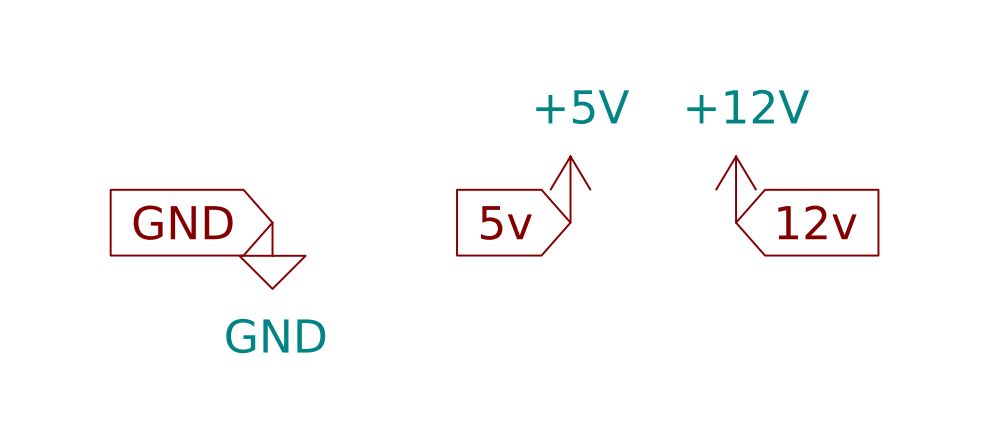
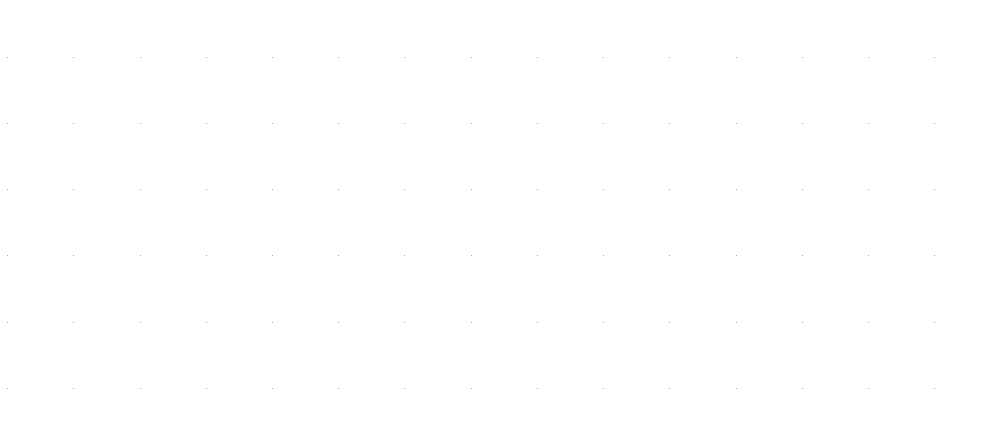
power symbol: +5V (570, 189) -> none
power symbol: +12V (736, 189) -> none
global label: GND (183, 222) -> none
global label: 12v (817, 222) -> none
global label: 5v (506, 223) -> none
power symbol: GND (272, 255) -> none

